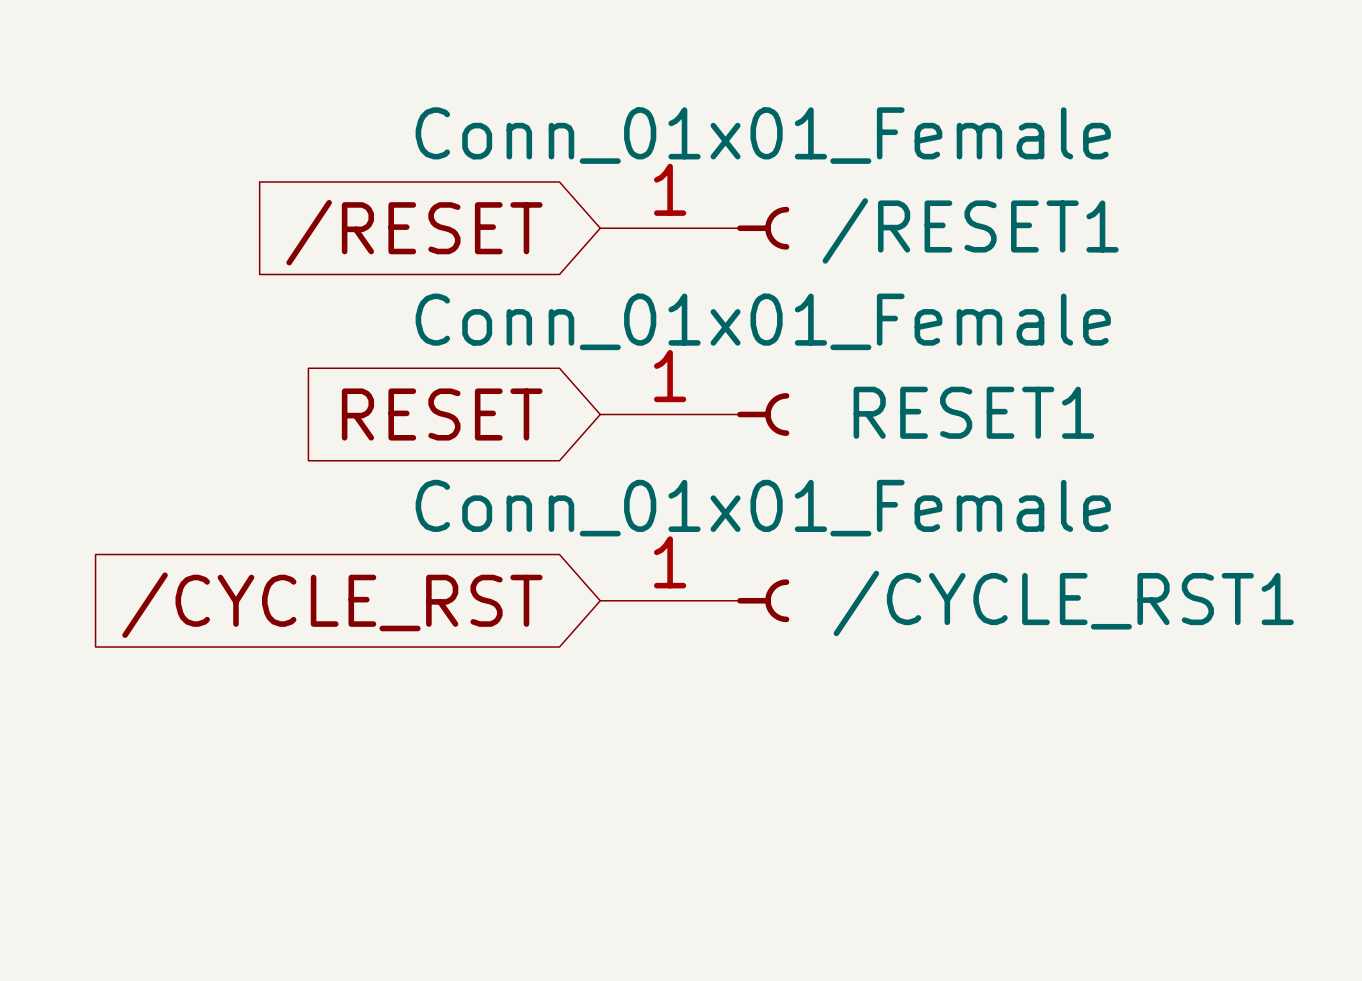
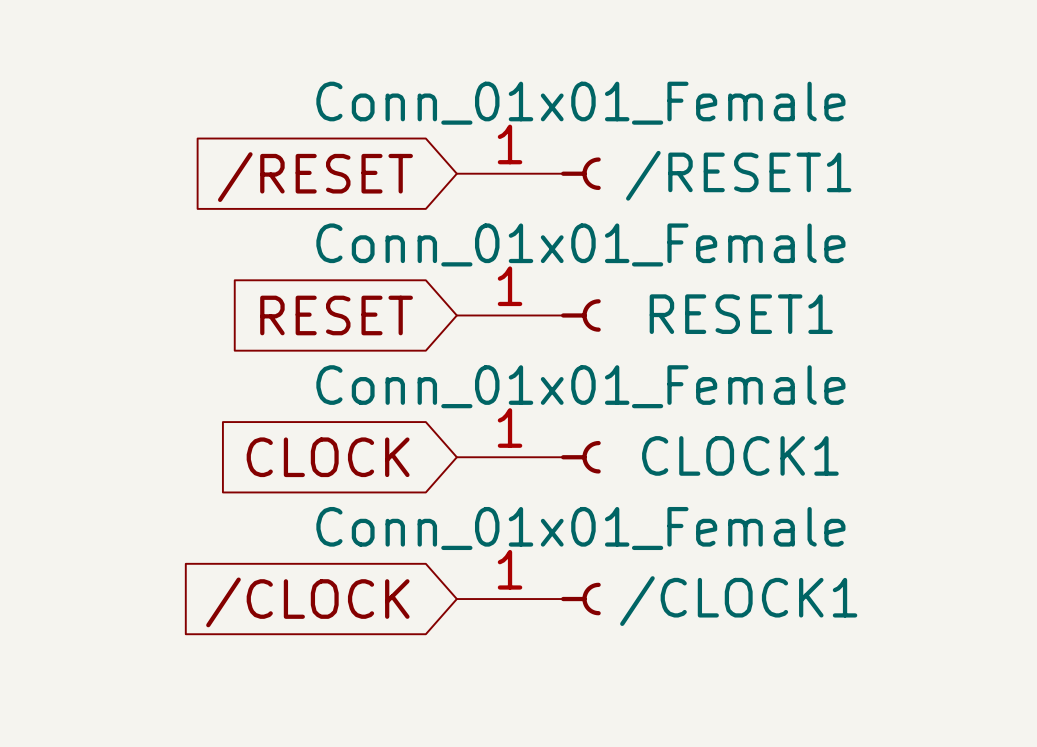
/CYCLE_RST1 name: /CYCLE_RST1 (1063, 603) -> CLOCK1 (740, 455)
global label: /CYCLE_RST (332, 605) -> CLOCK (328, 457)
/CLOCK1: none -> Conn_01x01_Female (528, 599)
global label: none -> /CLOCK (307, 602)

